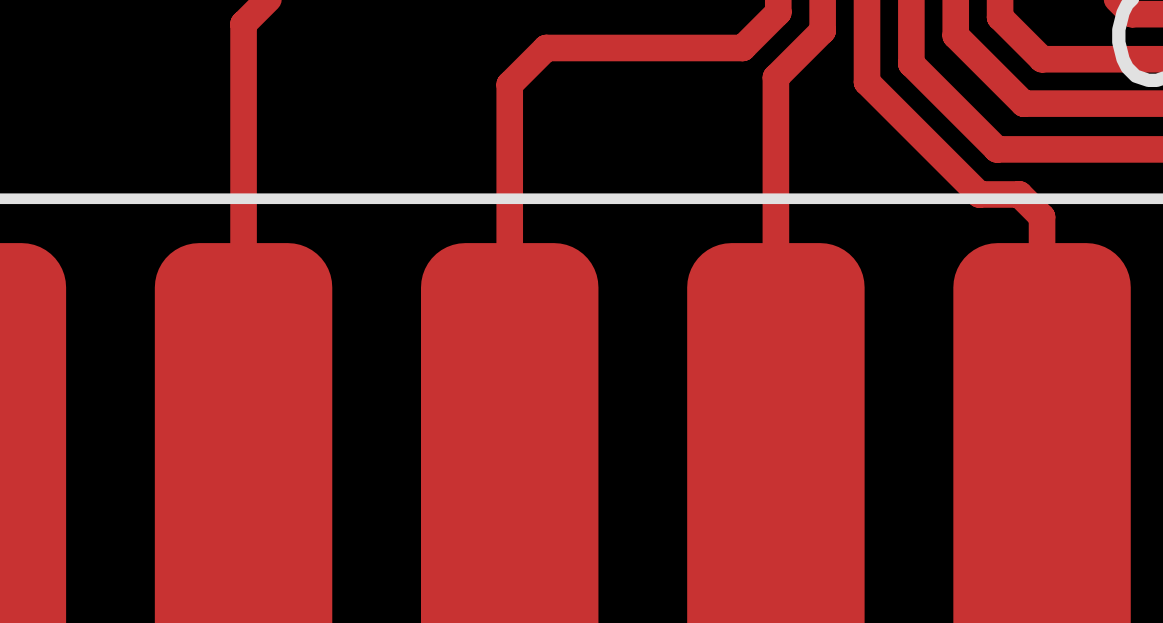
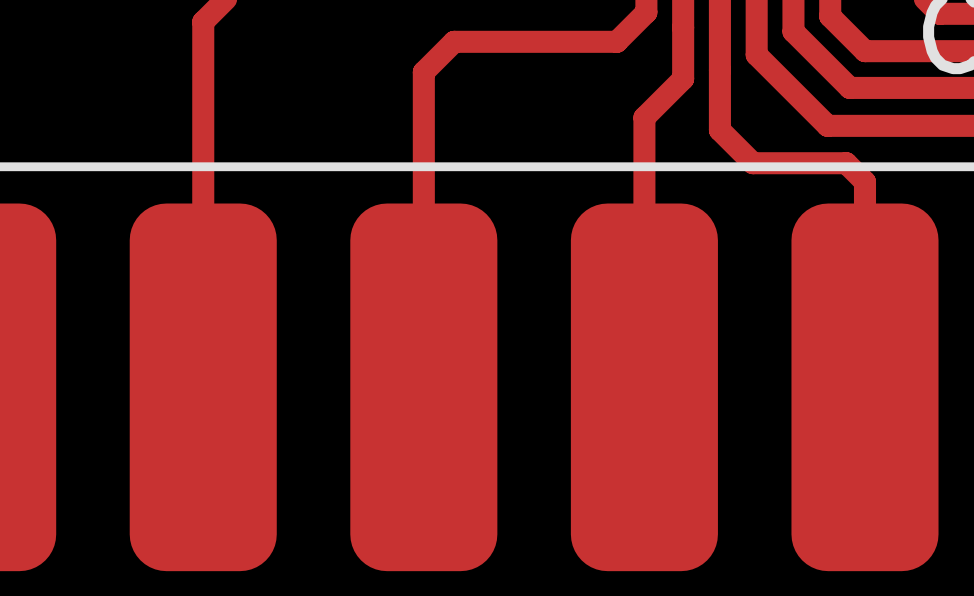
top track: (822, 30) (775, 77) (775, 139) -> (683, 27) (683, 78) (644, 117)
top track: (867, 82) (979, 194) -> (719, 70) (719, 130) (752, 163) (813, 163)

